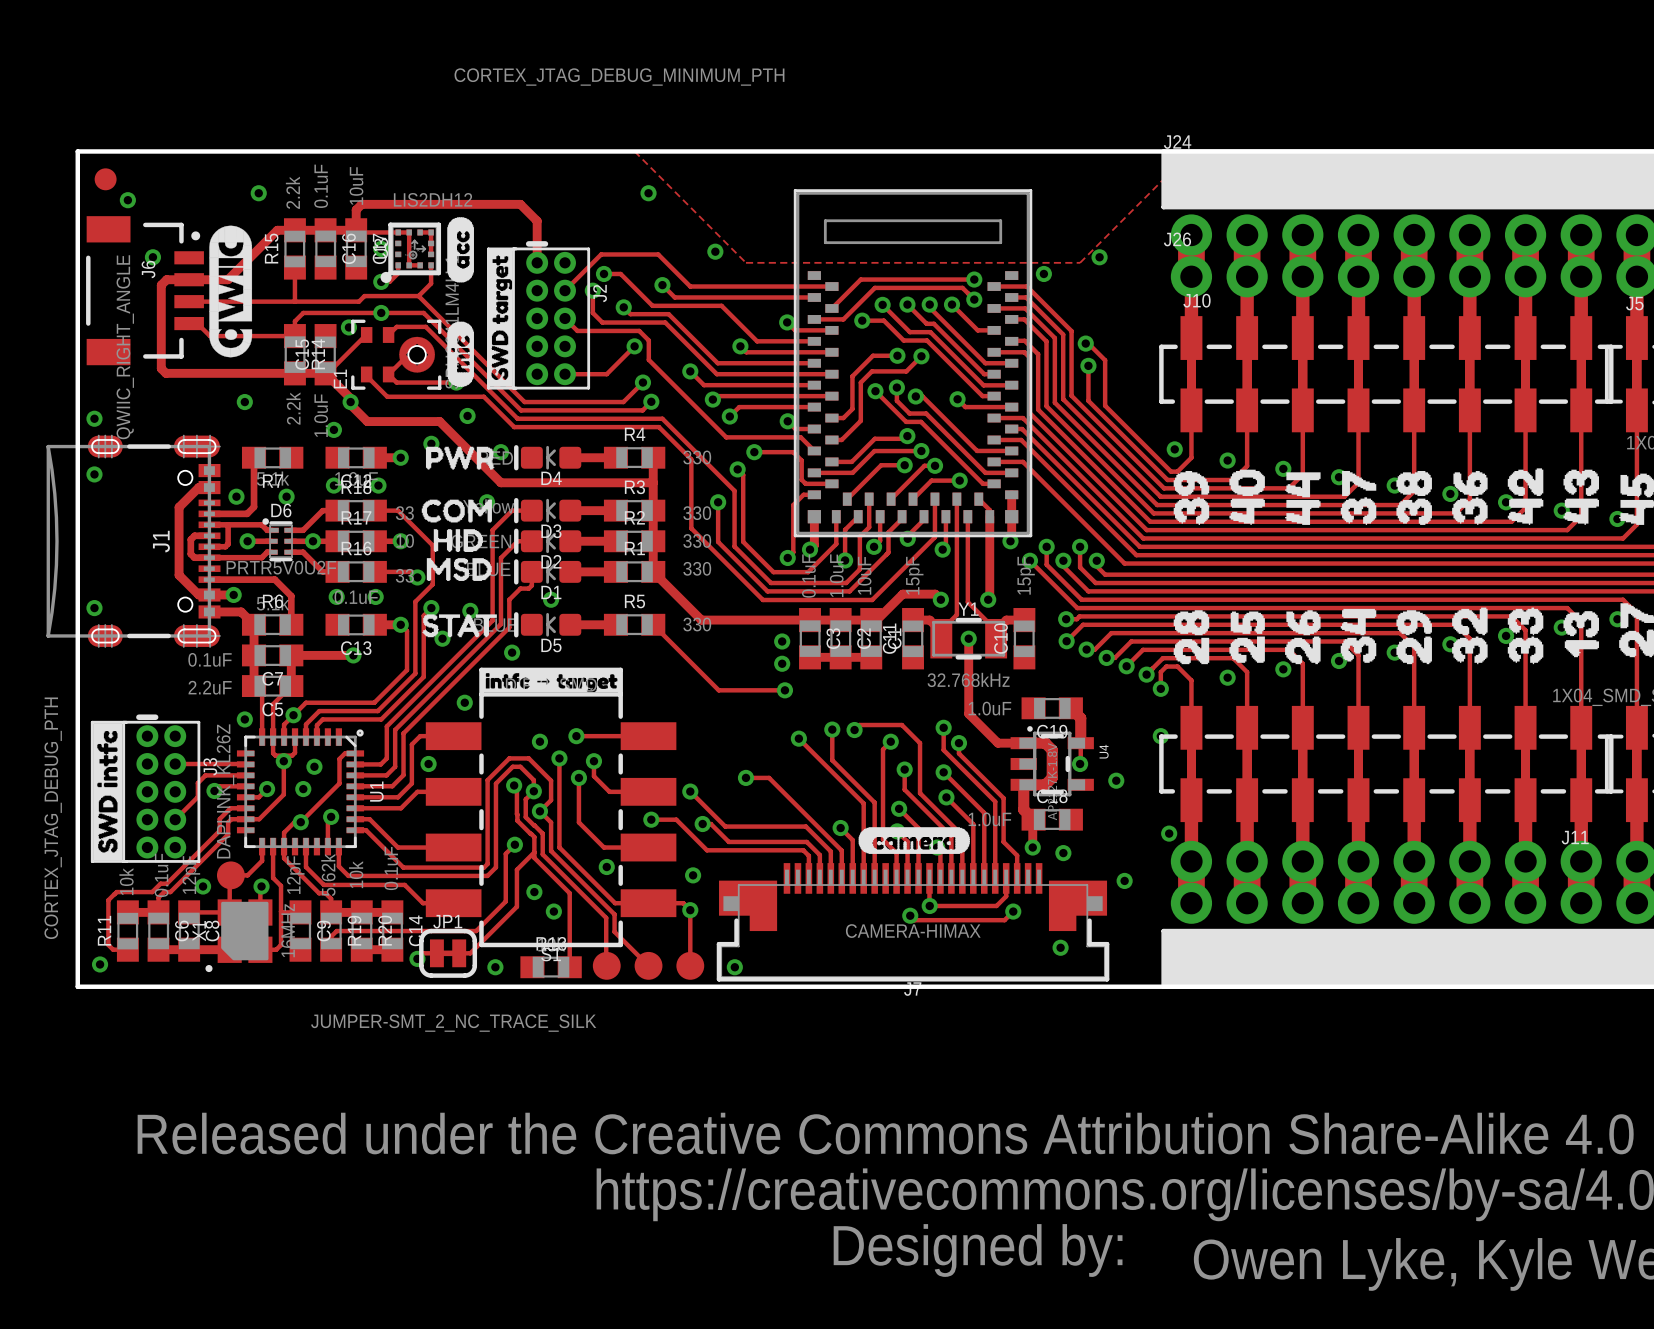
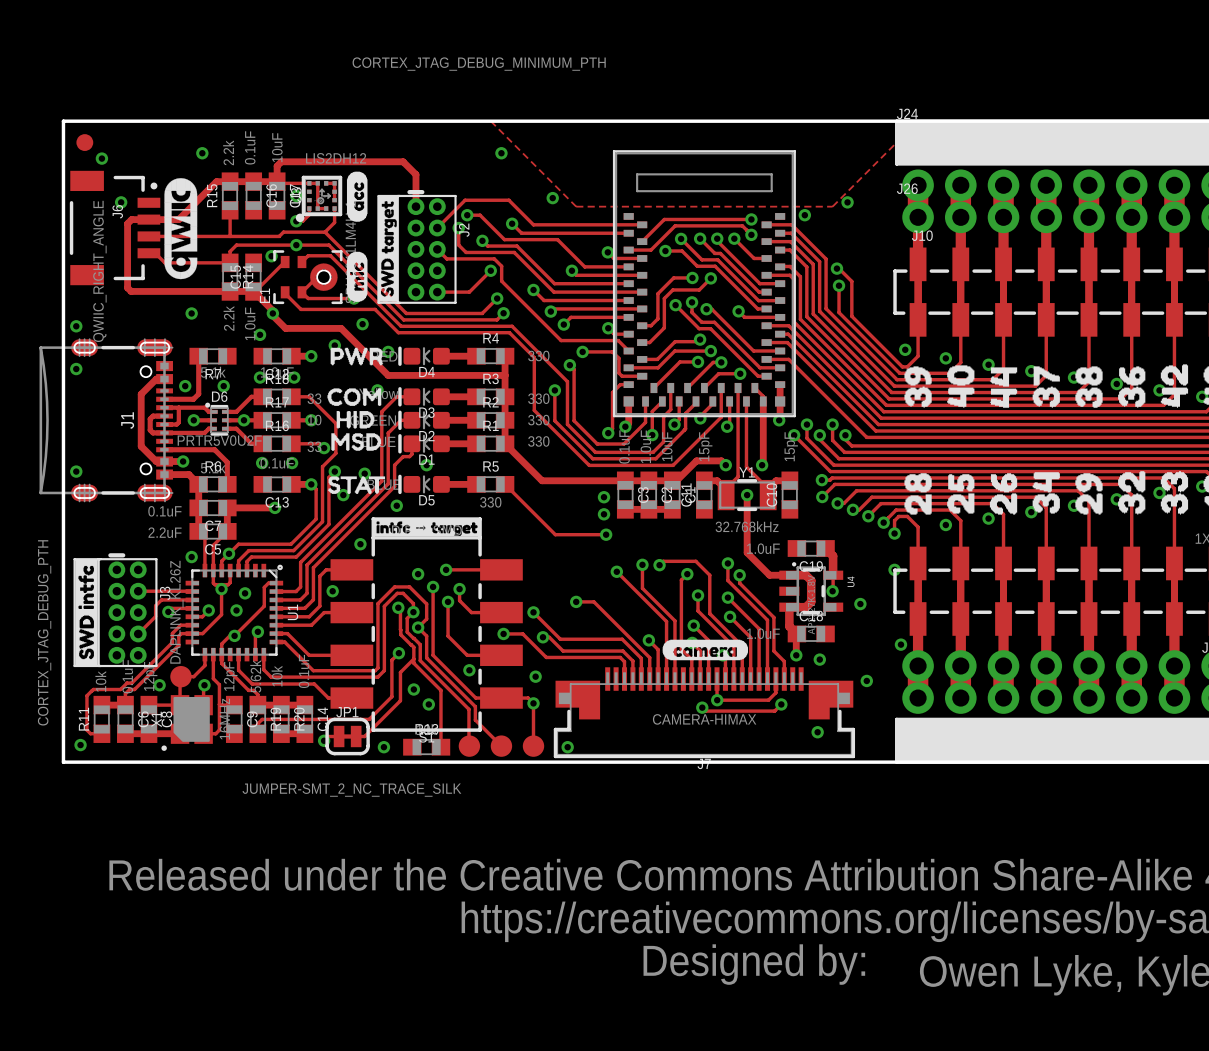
R5 value position: 330 (697, 624) -> 330 (490, 502)

